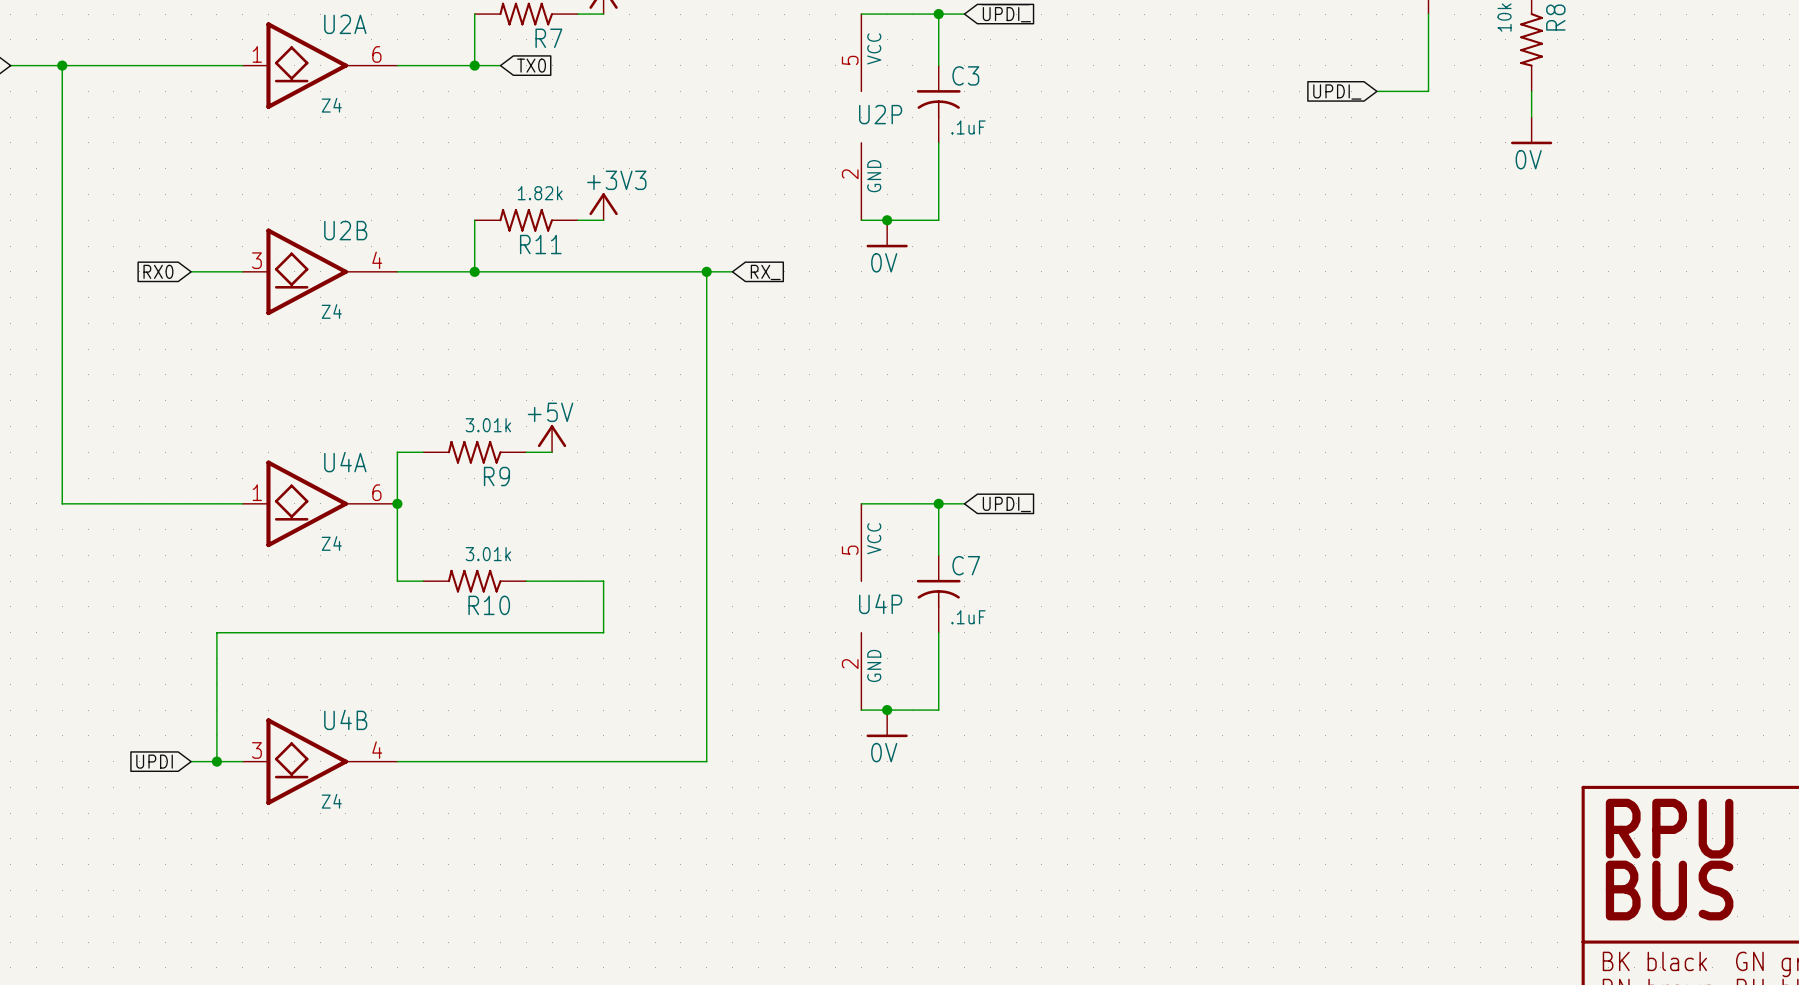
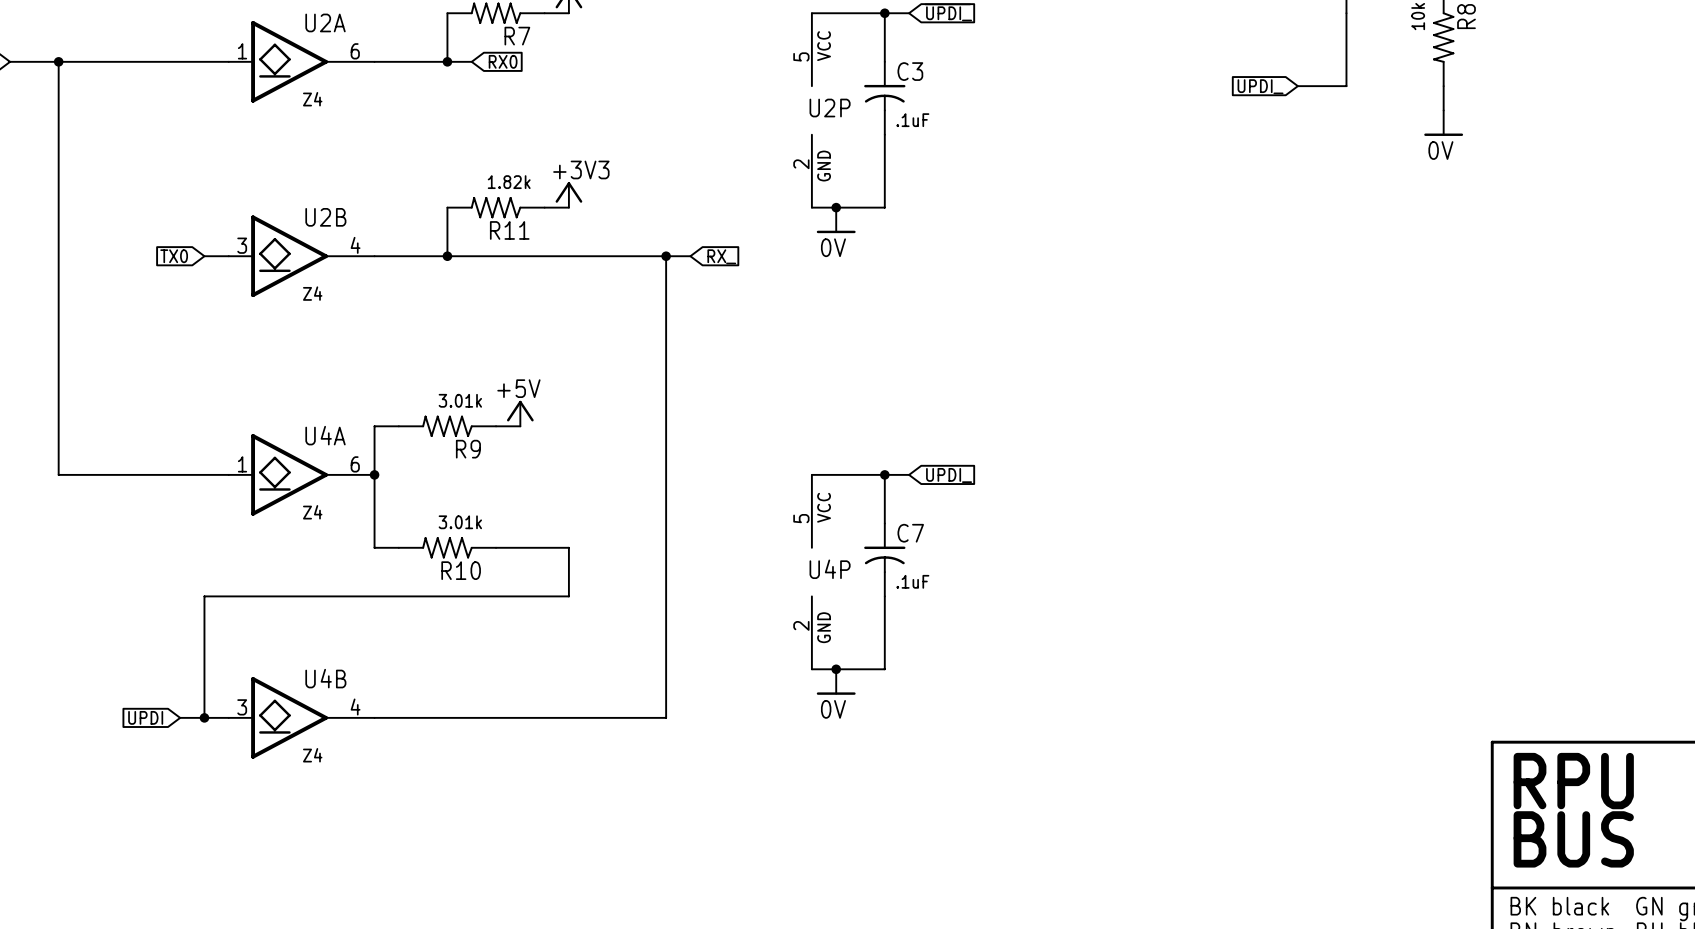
global label: TX0 (531, 65) -> RX0 (503, 61)
global label: RX0 (158, 271) -> TX0 (174, 256)
wire: (191, 271) (216, 271) -> none

